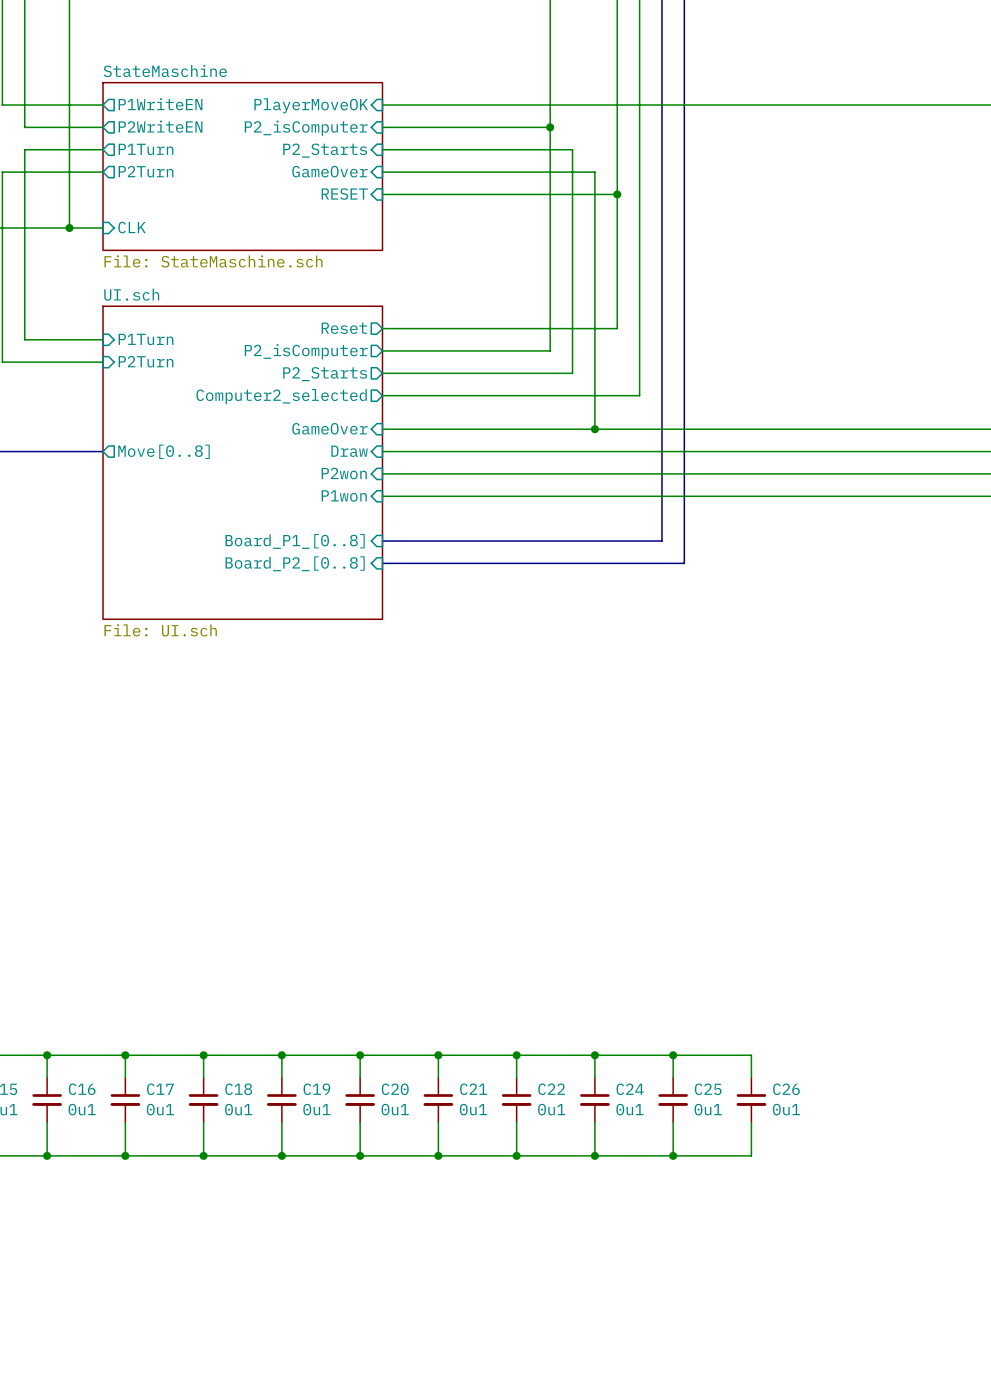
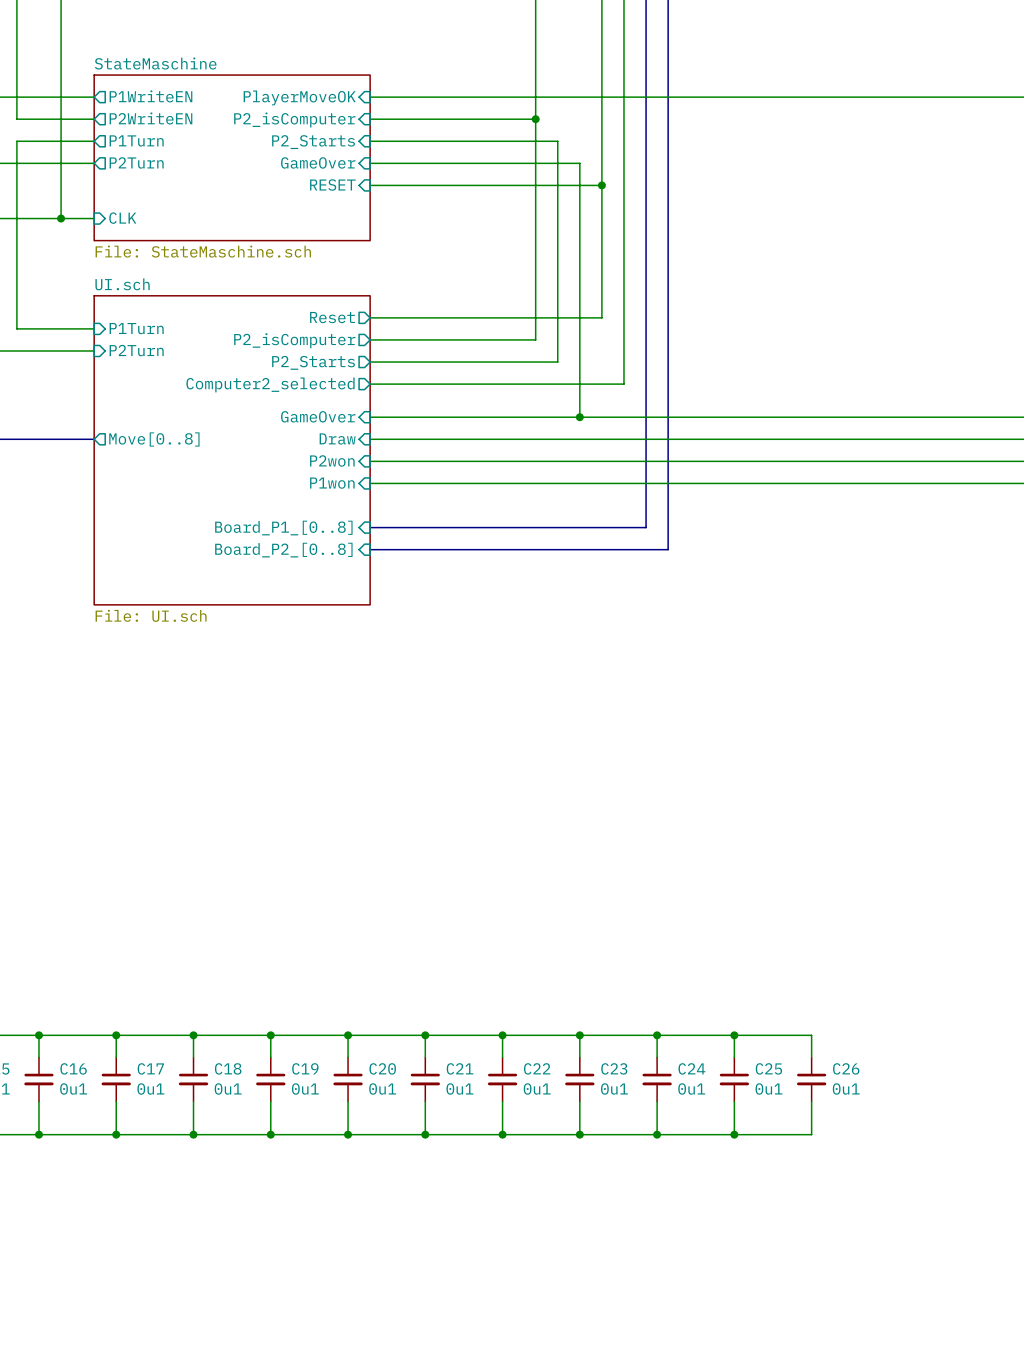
wire: none -> (734, 1035) (811, 1035) (811, 1057)
junction: none -> (734, 1035)
C24 name: C24 (630, 1089) -> C23 (614, 1068)
C25 name: C25 (708, 1089) -> C24 (691, 1068)
C26 name: C26 (786, 1089) -> C25 (768, 1068)
C26: none -> 0u1 (811, 1079)
wire: none -> (811, 1101) (811, 1134) (734, 1134)
junction: none -> (734, 1134)

